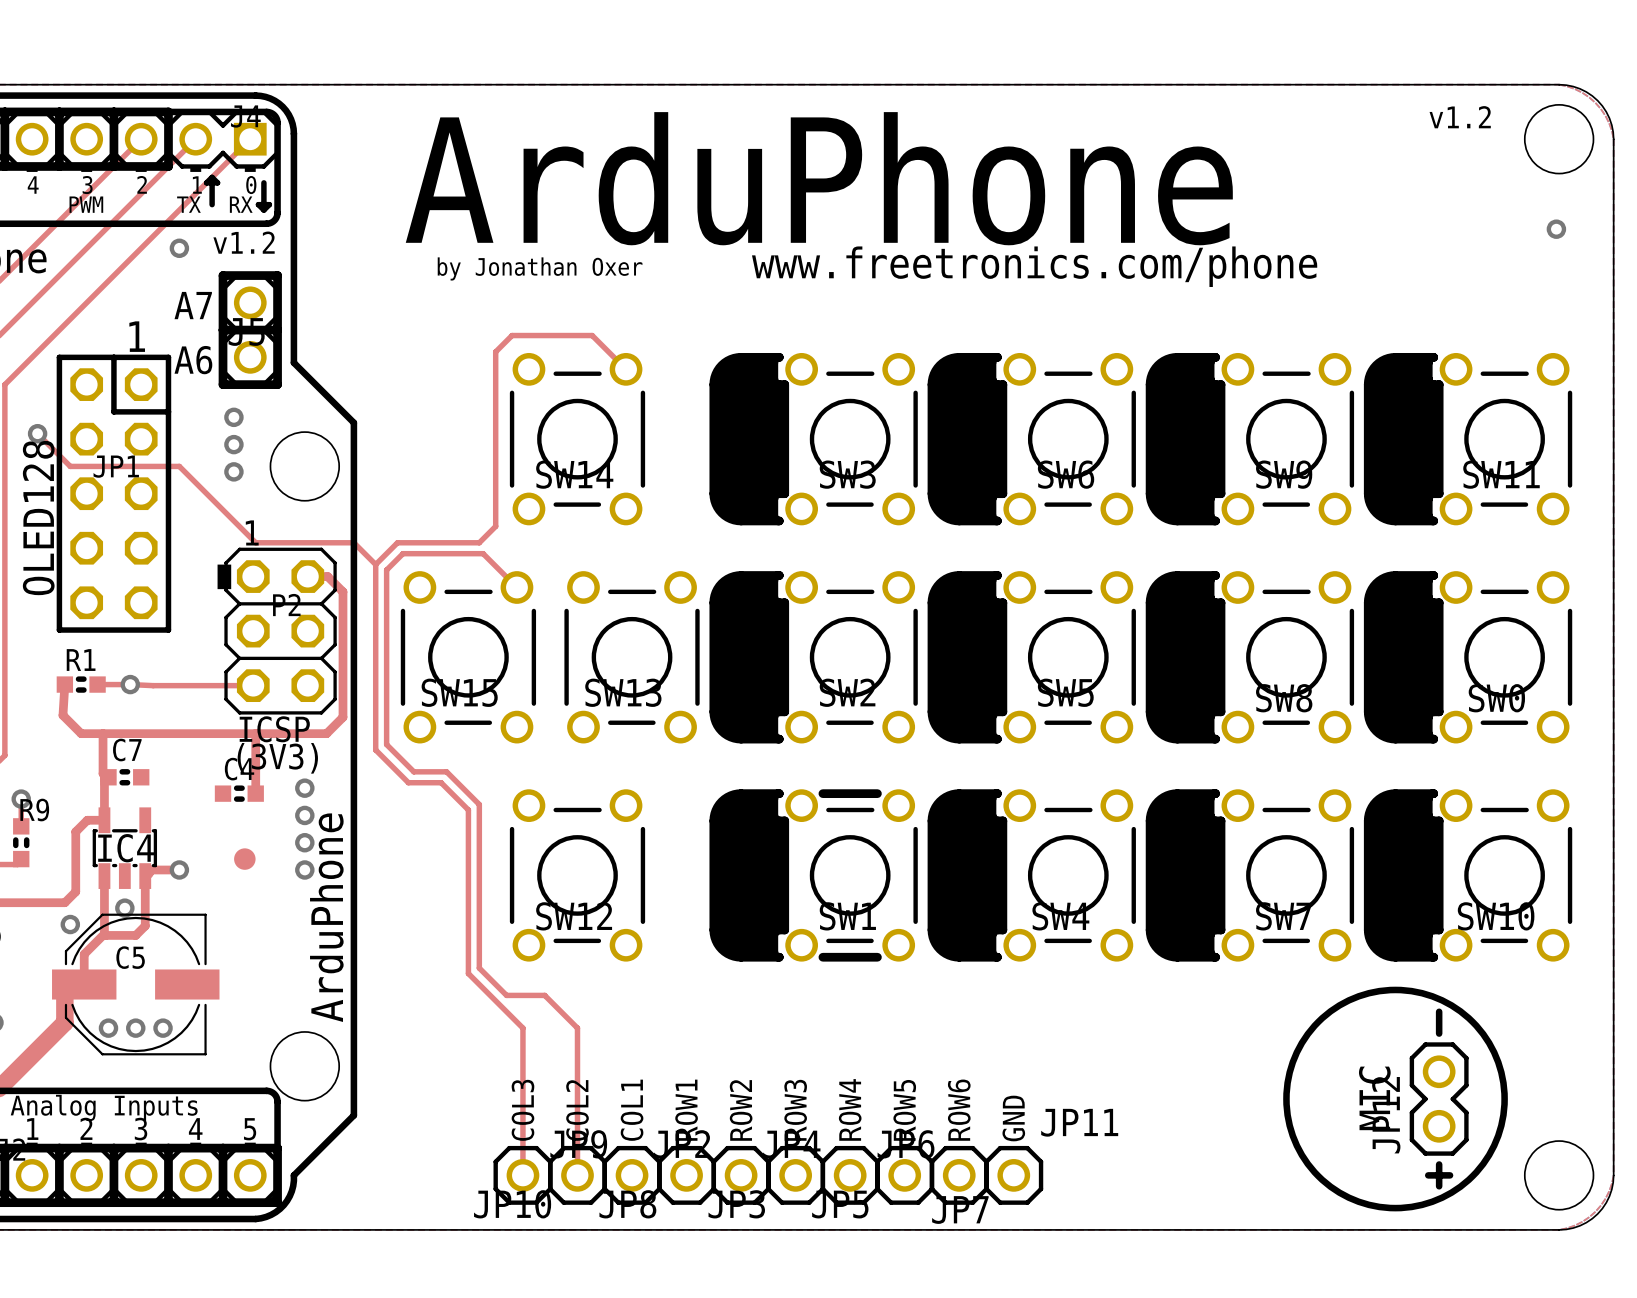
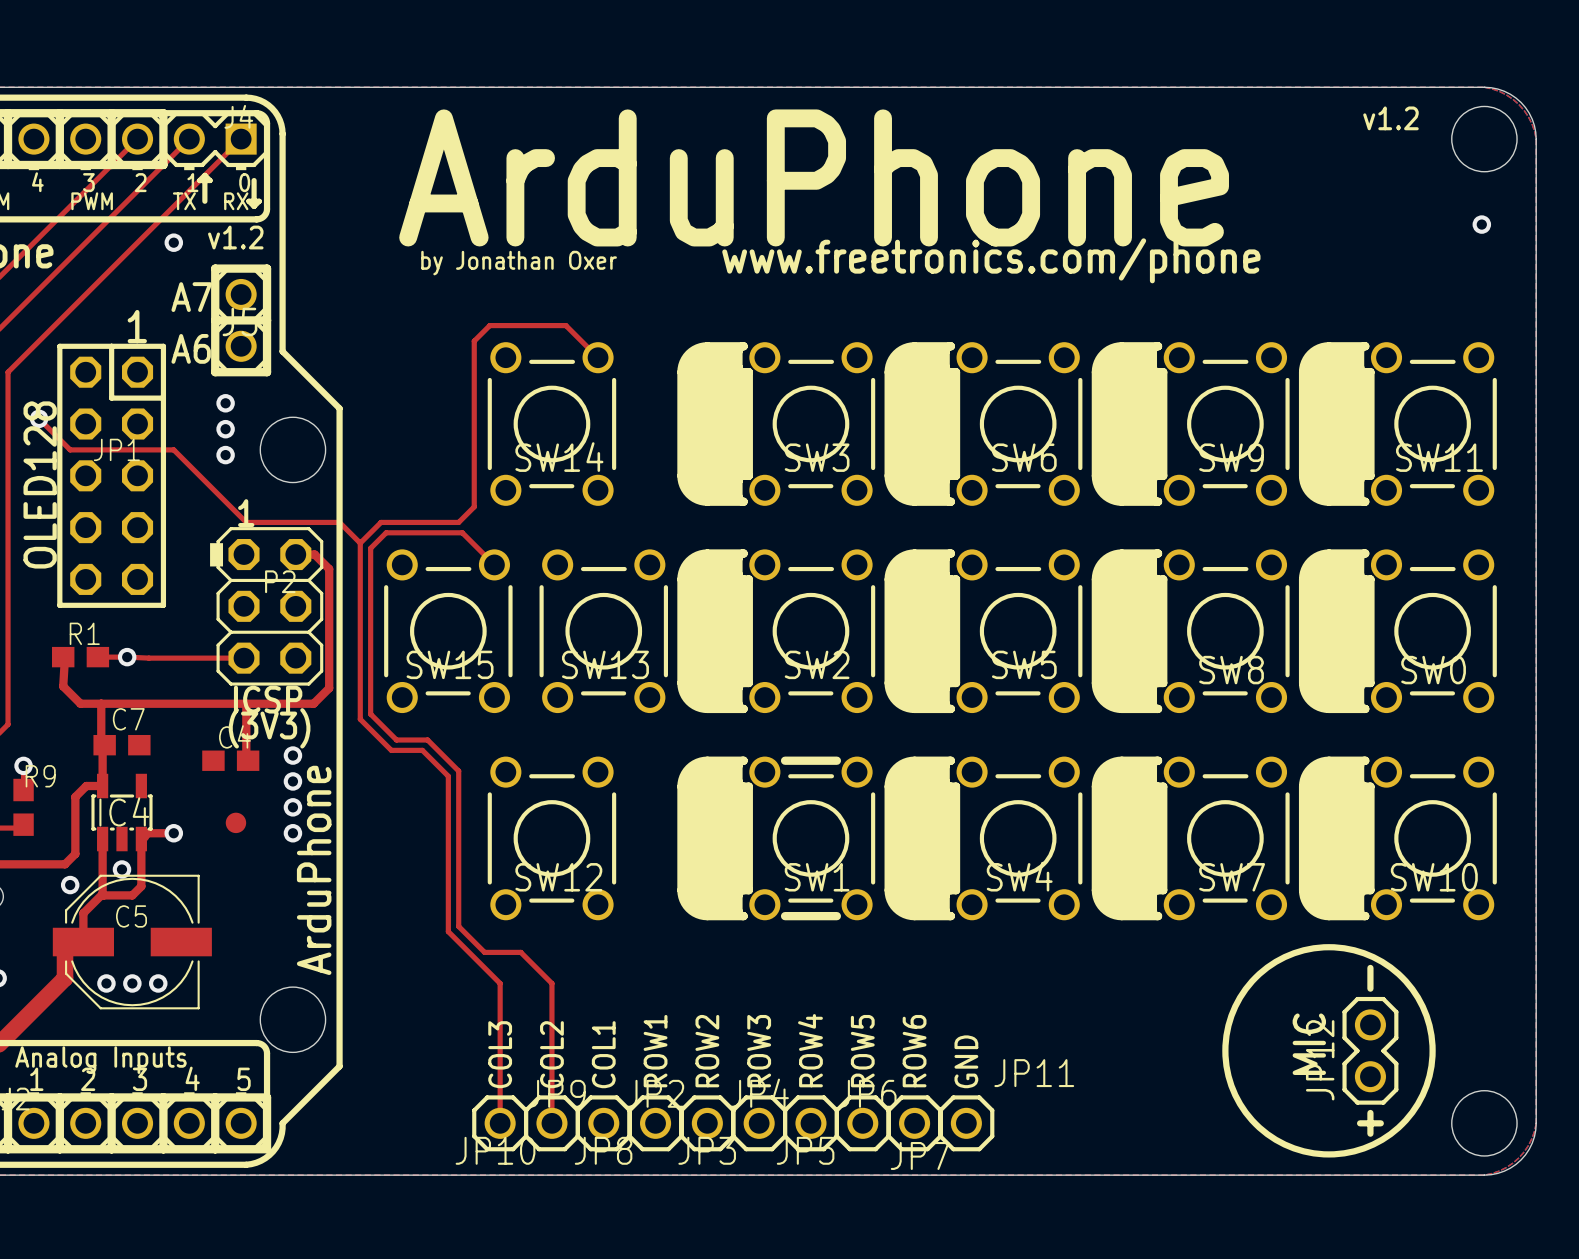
R1 footprint: [56, 676, 106, 693] -> [52, 646, 110, 668]
C7 footprint: [100, 769, 150, 786] -> [93, 734, 151, 756]
C4 footprint: [214, 785, 264, 802] -> [202, 750, 260, 771]
R9 footprint: [13, 818, 30, 868] -> [13, 778, 34, 836]

